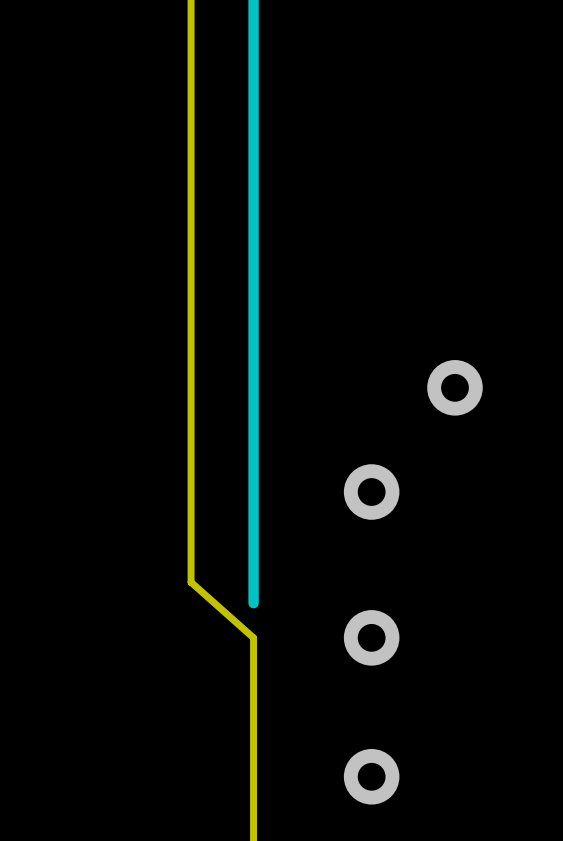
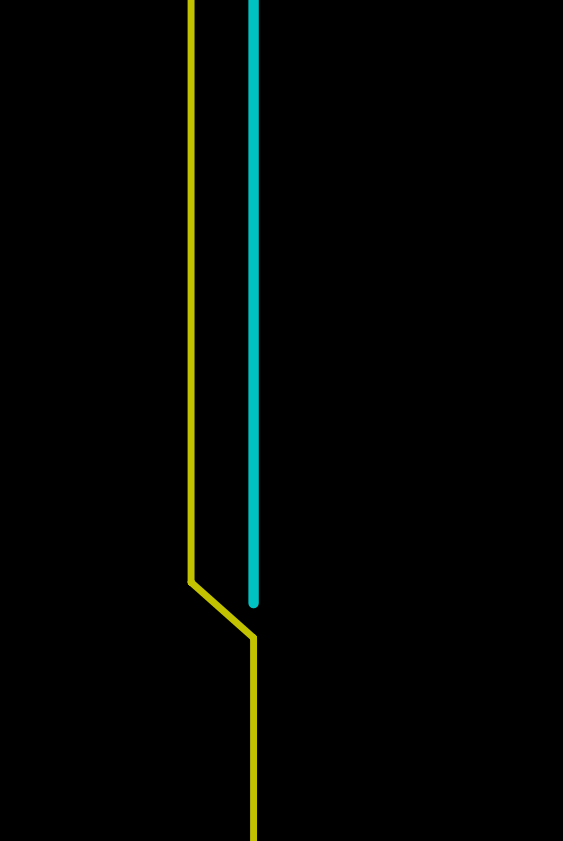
via: (454, 387) -> none
via: (371, 492) -> none
via: (371, 637) -> none
via: (371, 776) -> none

